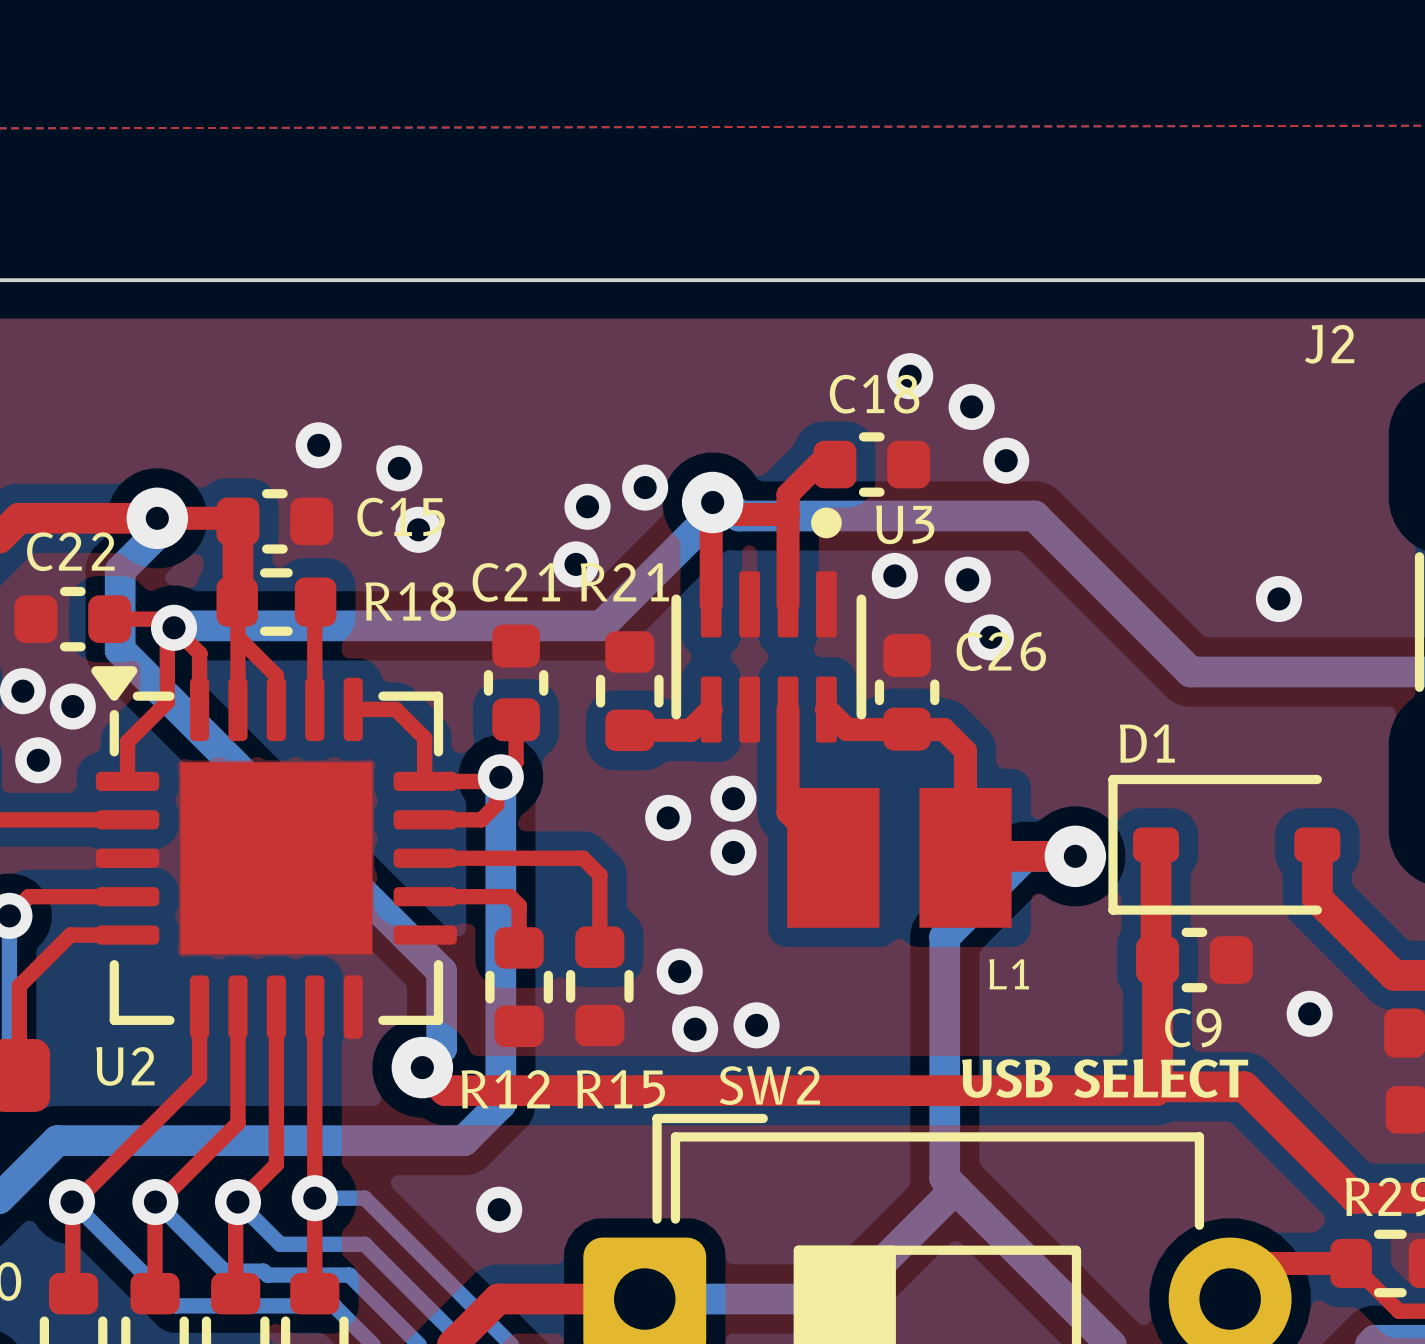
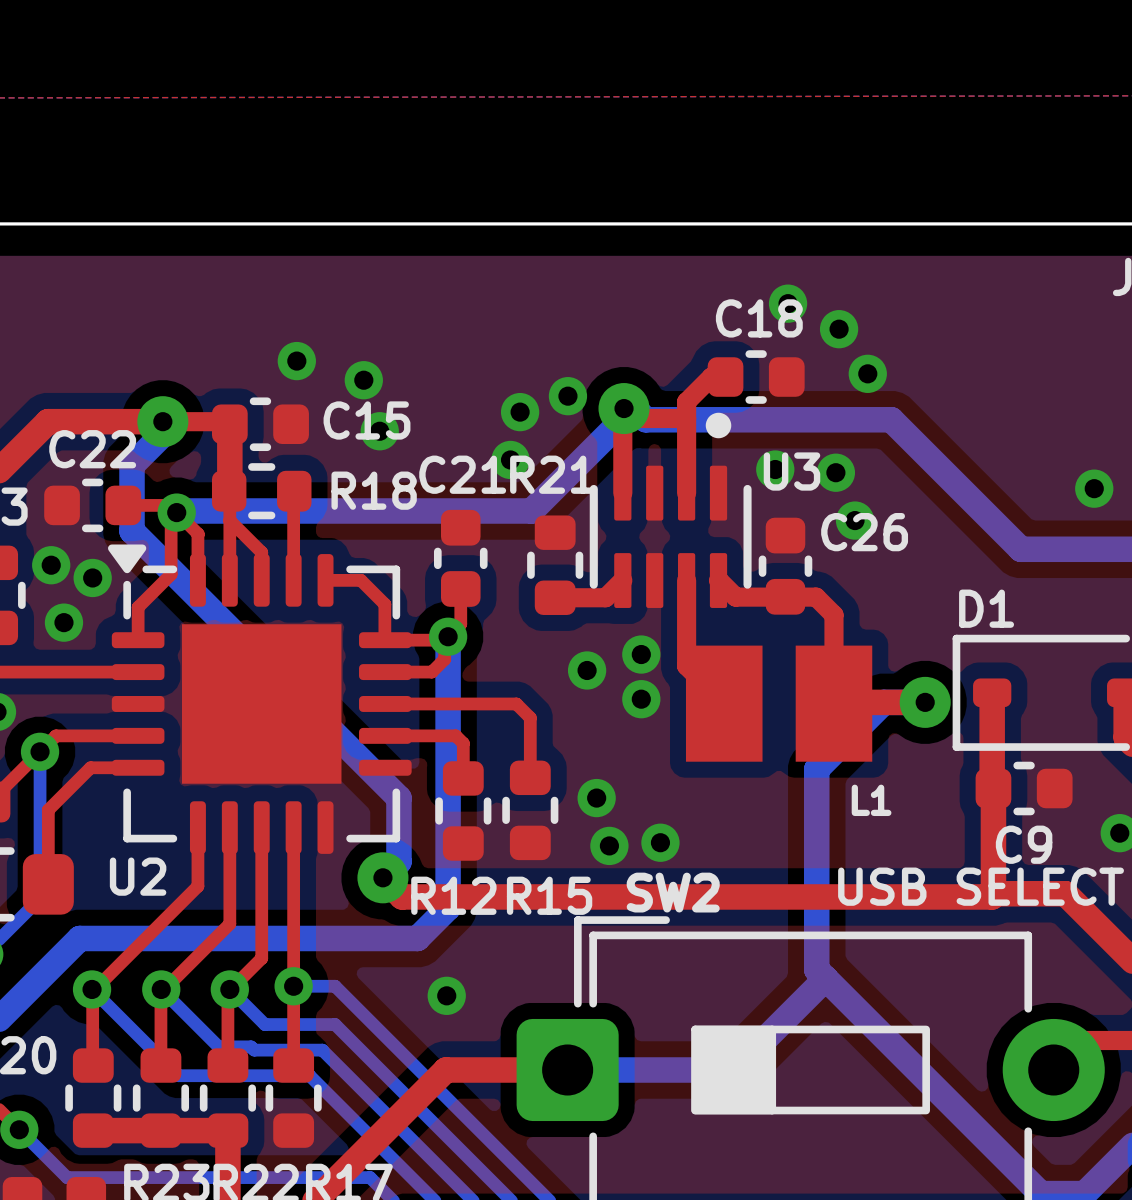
U3 name position: U3 (905, 524) -> U3 (791, 471)

